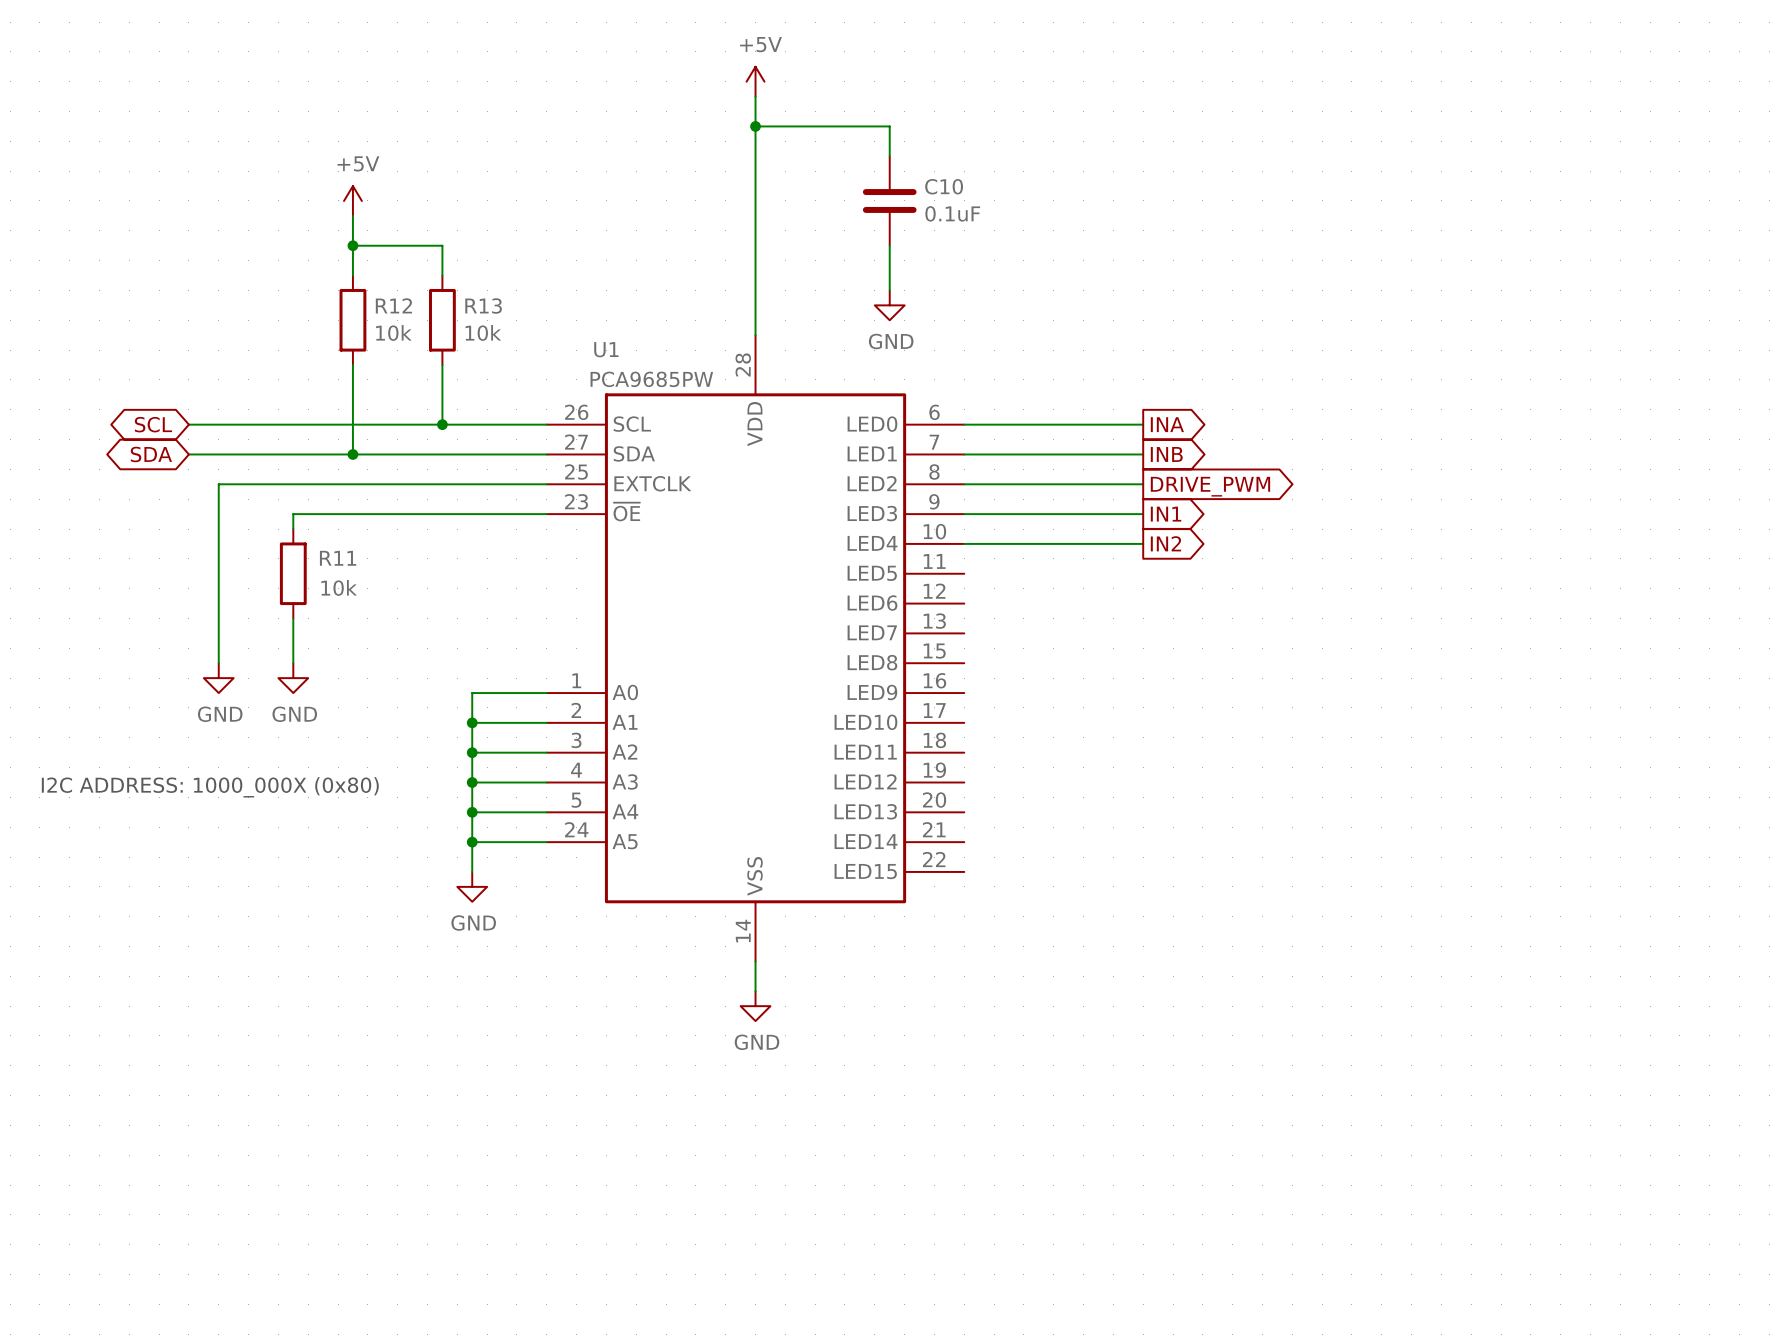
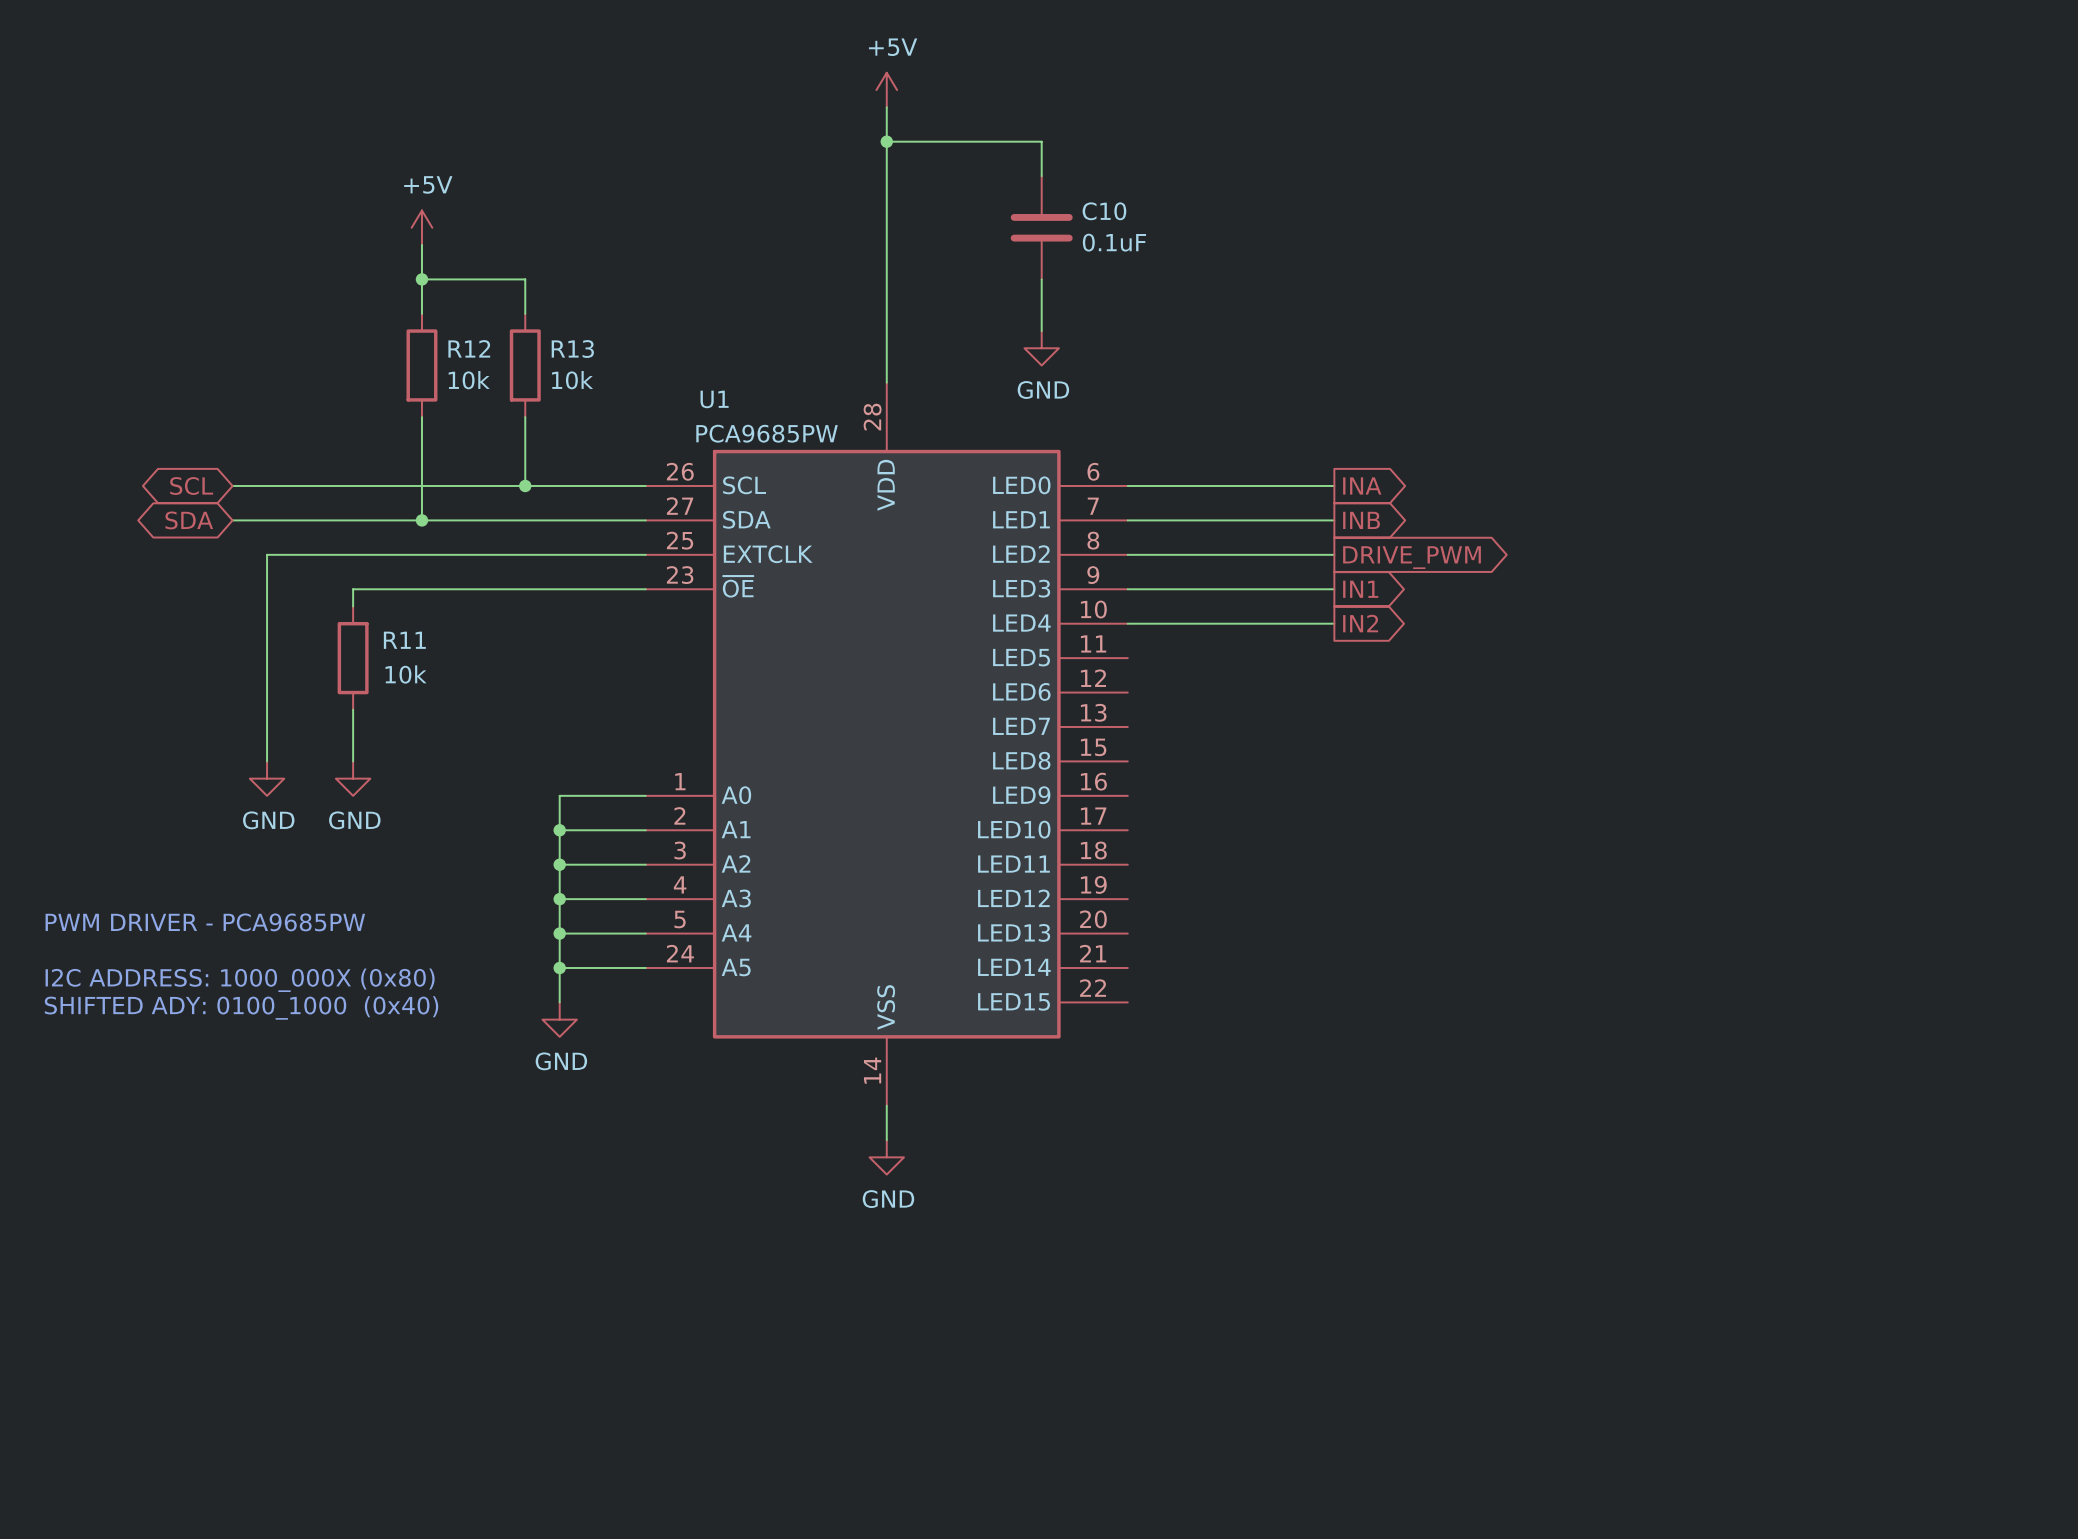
text position: I2C ADDRESS: 1000_000X (0x80) (210, 787) -> I2C ADDRESS: 1000_000X (0x80) (240, 980)
text: none -> PWM DRIVER - PCA9685PW (205, 922)
text: none -> SHIFTED ADY: 0100_1000 (0x40) (241, 1007)

